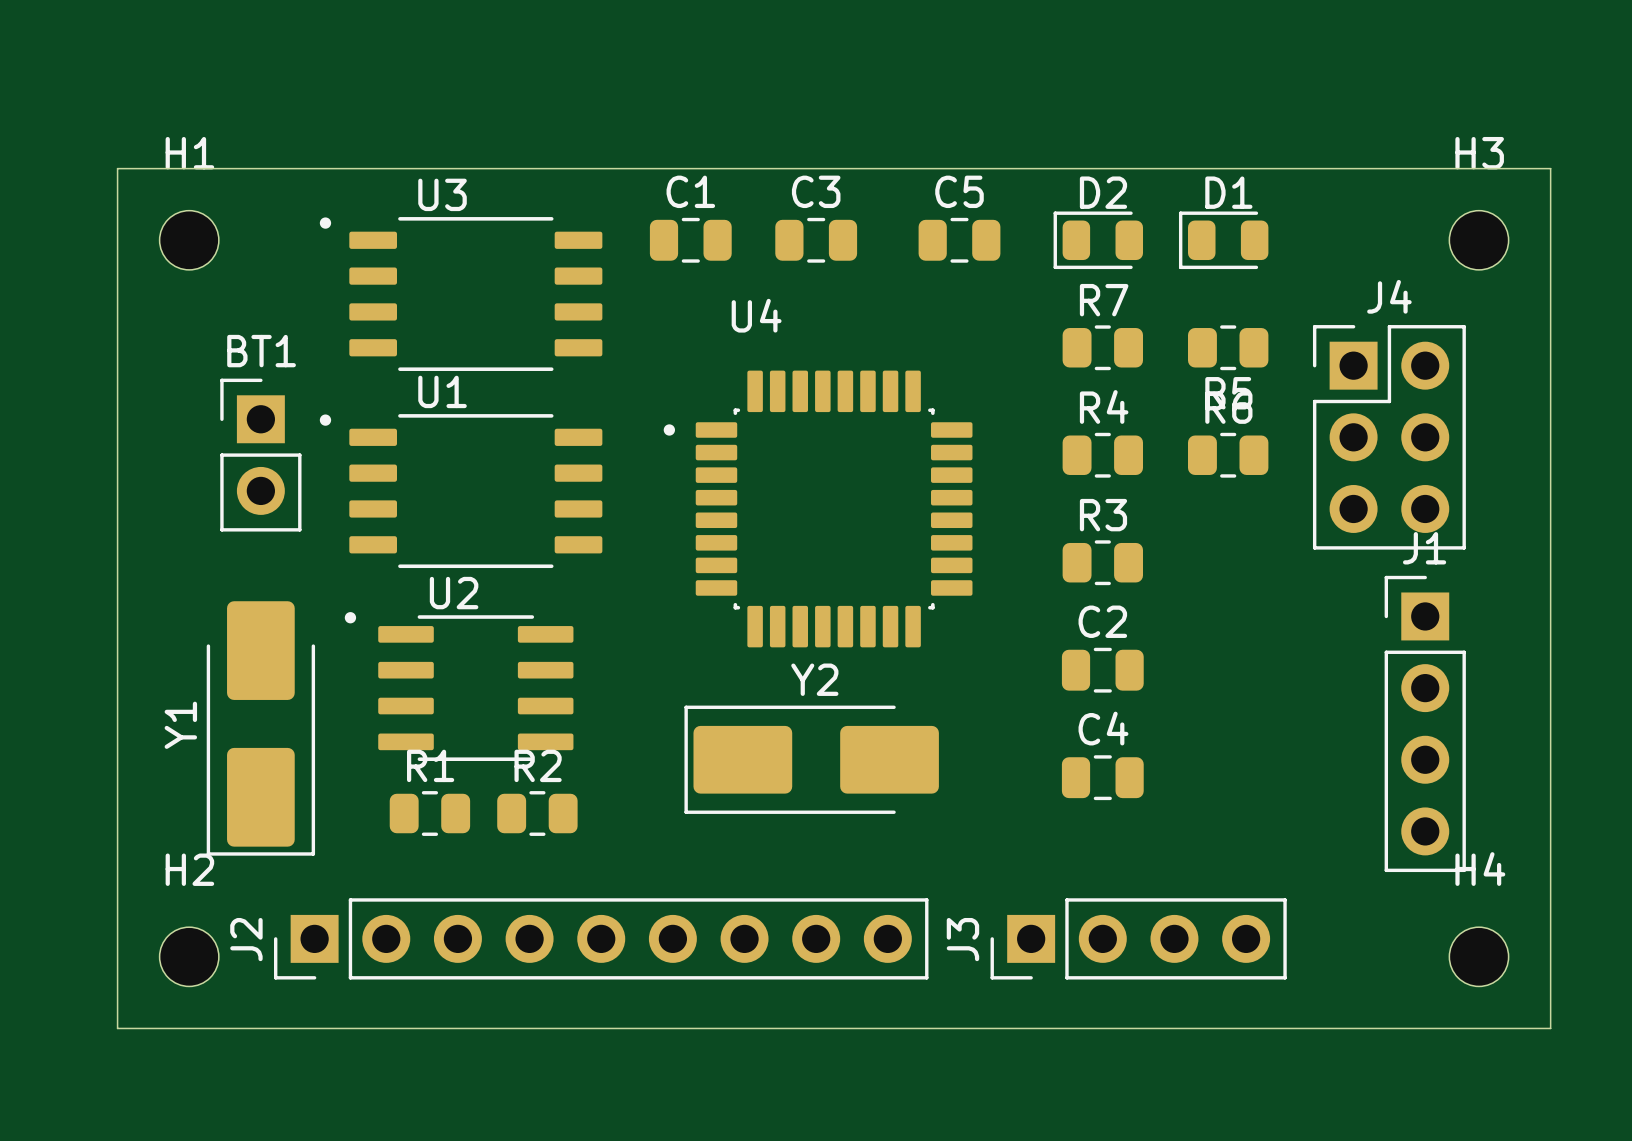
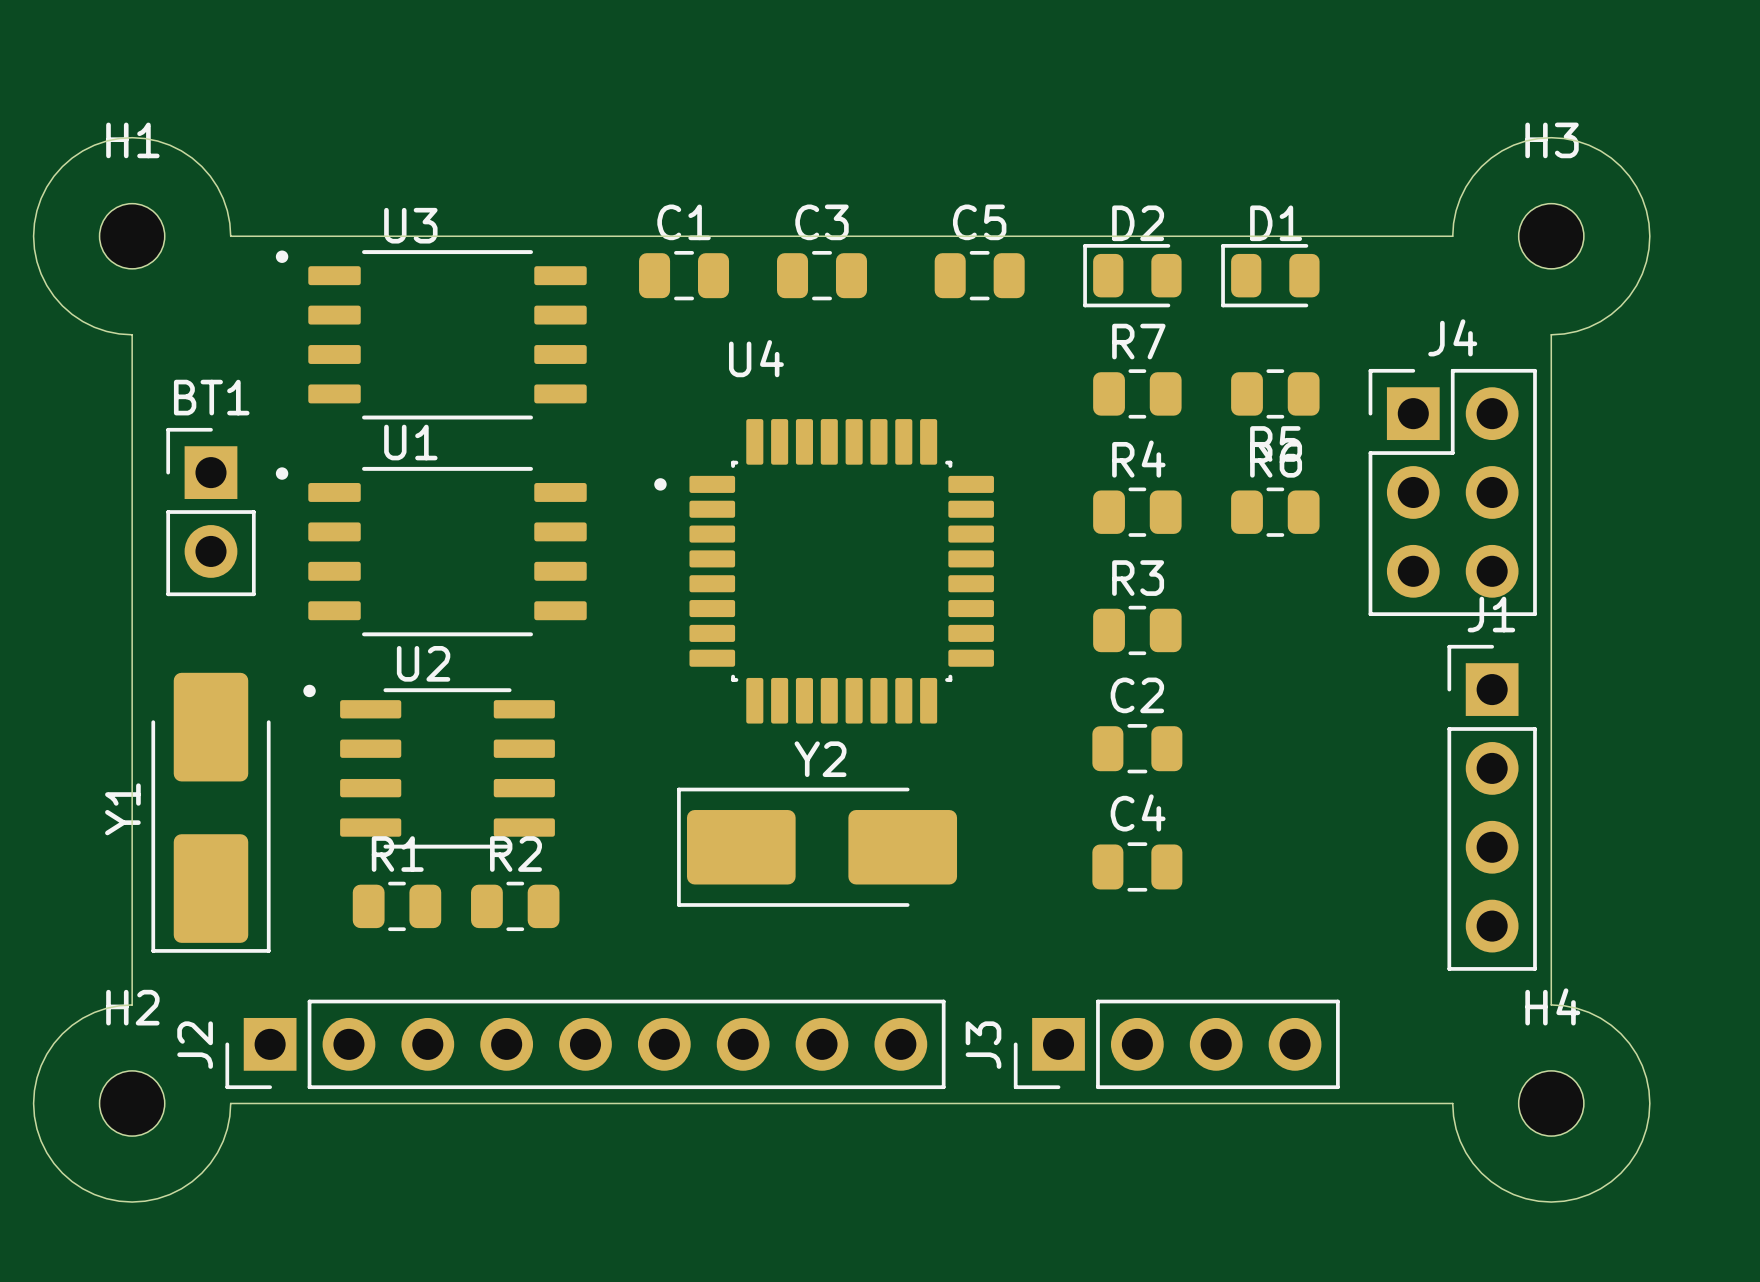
board edge: (117, 168) (1550, 168) (1550, 1028) (117, 1028) (117, 168) -> (230, 236) (227, 210) (223, 198) (217, 186) (201, 166) (192, 158) (169, 145) (145, 138) (132, 137) (106, 141) (82, 150) (72, 158) (53, 176) (46, 186) (41, 198) (34, 223) (33, 236) (36, 261) (46, 285) (53, 296) (62, 305) (82, 321) (106, 331) (132, 334) (132, 1004) (119, 1005) (94, 1012) (82, 1018) (62, 1033) (53, 1043) (41, 1065) (36, 1077) (33, 1103) (36, 1128) (46, 1152) (62, 1173) (82, 1188) (106, 1198) (132, 1202) (157, 1198) (181, 1188) (201, 1173) (217, 1152) (227, 1128) (230, 1103) (1452, 1103) (1453, 1116) (1460, 1141) (1465, 1152) (1481, 1173) (1502, 1188) (1513, 1194) (1525, 1198) (1551, 1202) (1576, 1198) (1600, 1188) (1620, 1173) (1636, 1152) (1646, 1128) (1649, 1103) (1646, 1077) (1636, 1054) (1620, 1033) (1600, 1018) (1576, 1008) (1551, 1004) (1551, 334) (1576, 331) (1588, 327) (1611, 314) (1620, 305) (1629, 296) (1642, 273) (1646, 261) (1649, 236) (1646, 210) (1636, 186) (1620, 166) (1600, 150) (1576, 141) (1551, 137) (1525, 141) (1502, 150) (1481, 166) (1465, 186) (1456, 210) (1452, 236) (230, 236)
H1 position: (189, 240) -> (132, 236)
H3 position: (1478, 240) -> (1551, 236)
H2 position: (189, 956) -> (132, 1103)
H4 position: (1478, 956) -> (1551, 1103)

